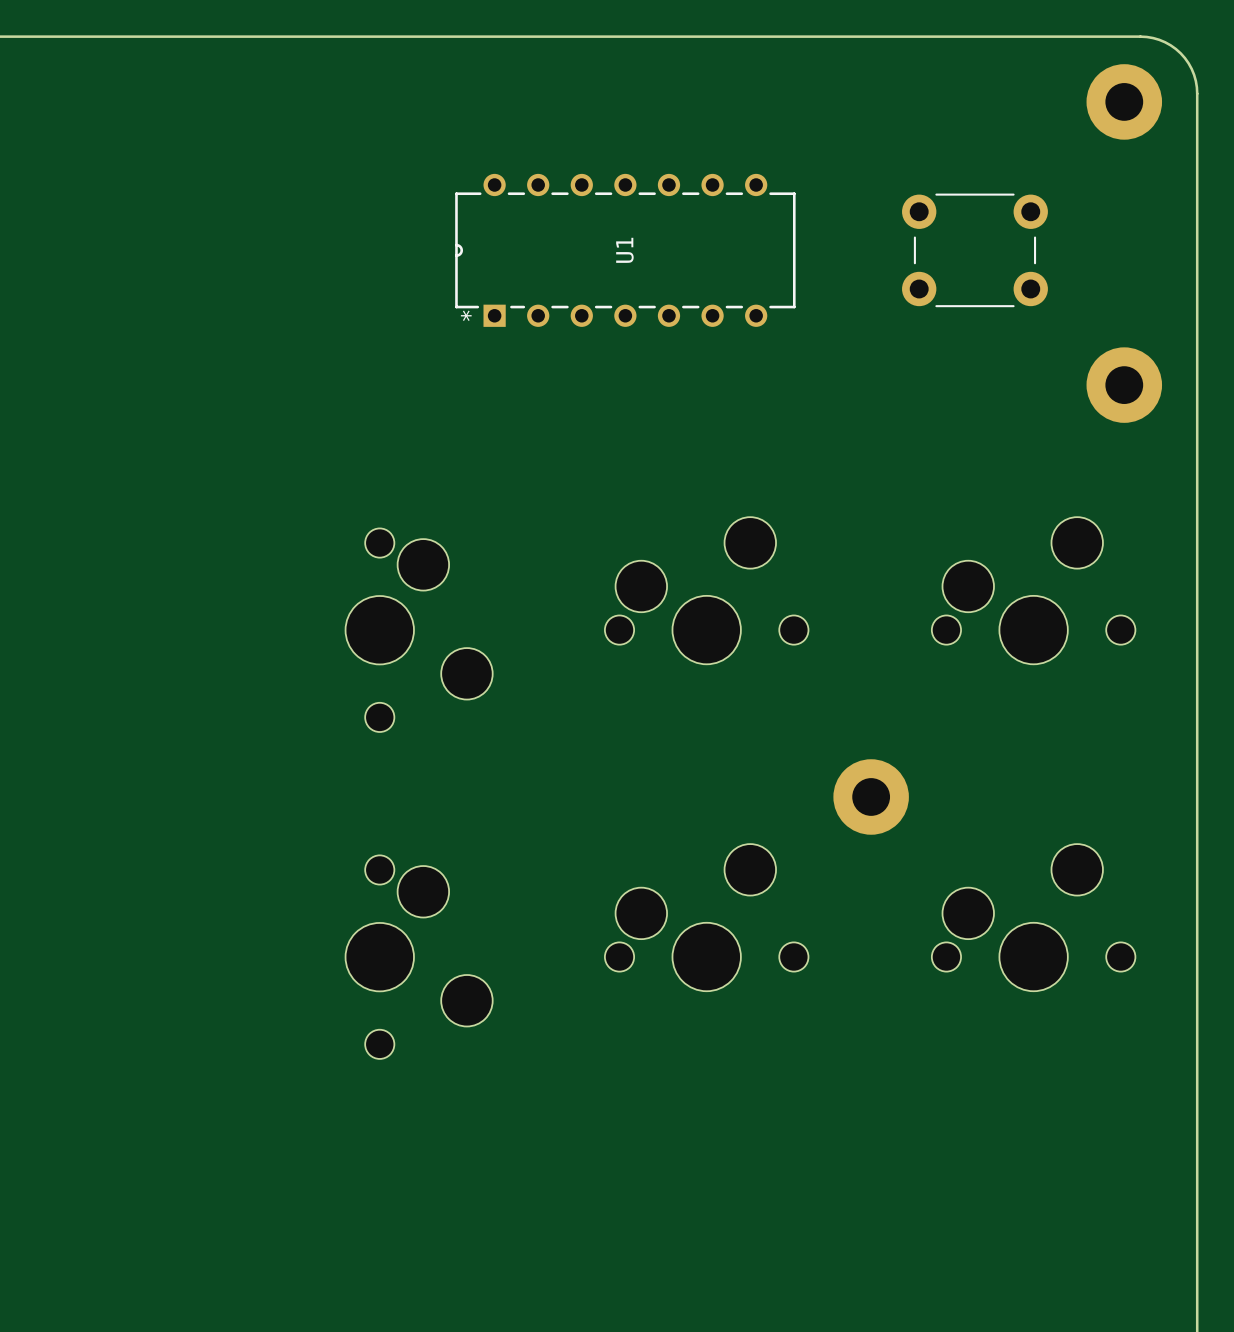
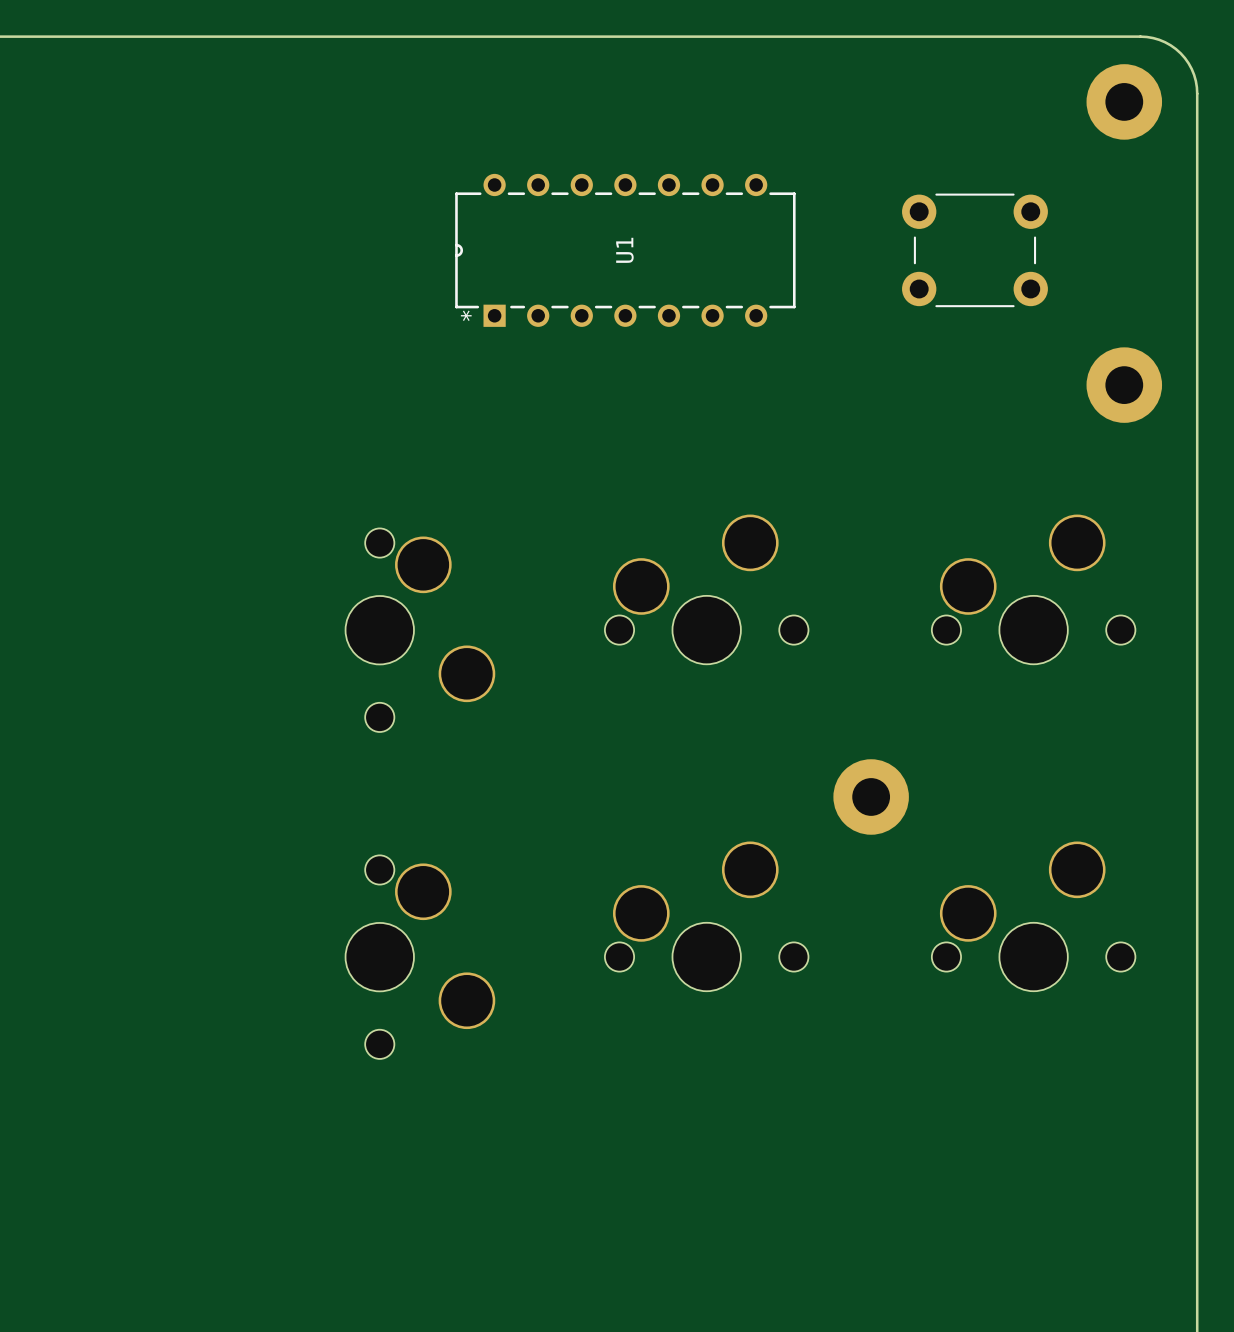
part footprint: [604, 517, 809, 665] -> [604, 514, 809, 665]
part footprint: [931, 517, 1136, 665] -> [931, 514, 1136, 665]
part footprint: [345, 528, 493, 733] -> [345, 528, 496, 733]
part footprint: [604, 844, 809, 992] -> [604, 841, 809, 992]
part footprint: [931, 844, 1136, 992] -> [931, 841, 1136, 992]
part footprint: [345, 855, 493, 1059] -> [345, 855, 496, 1059]

